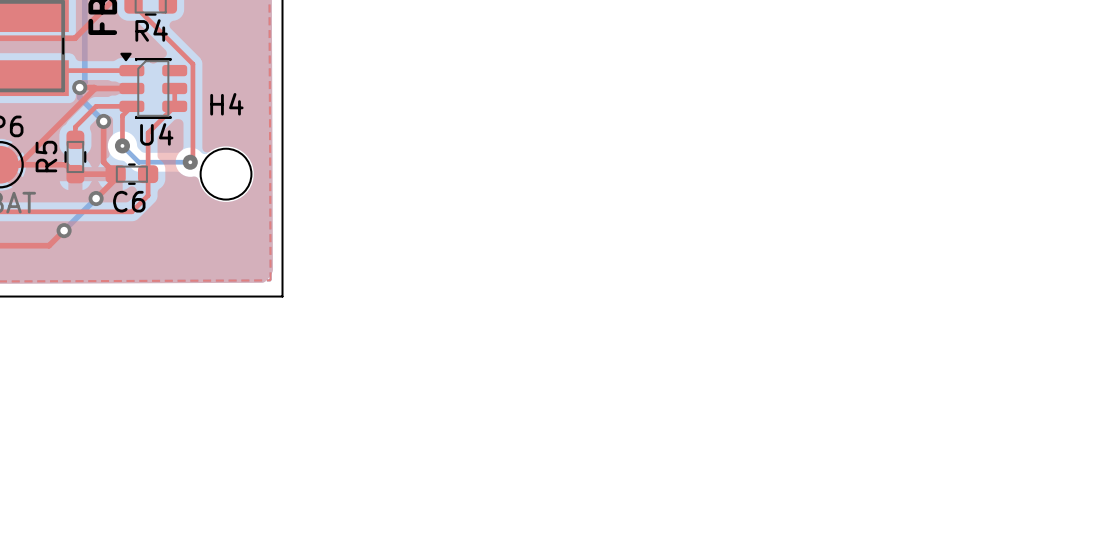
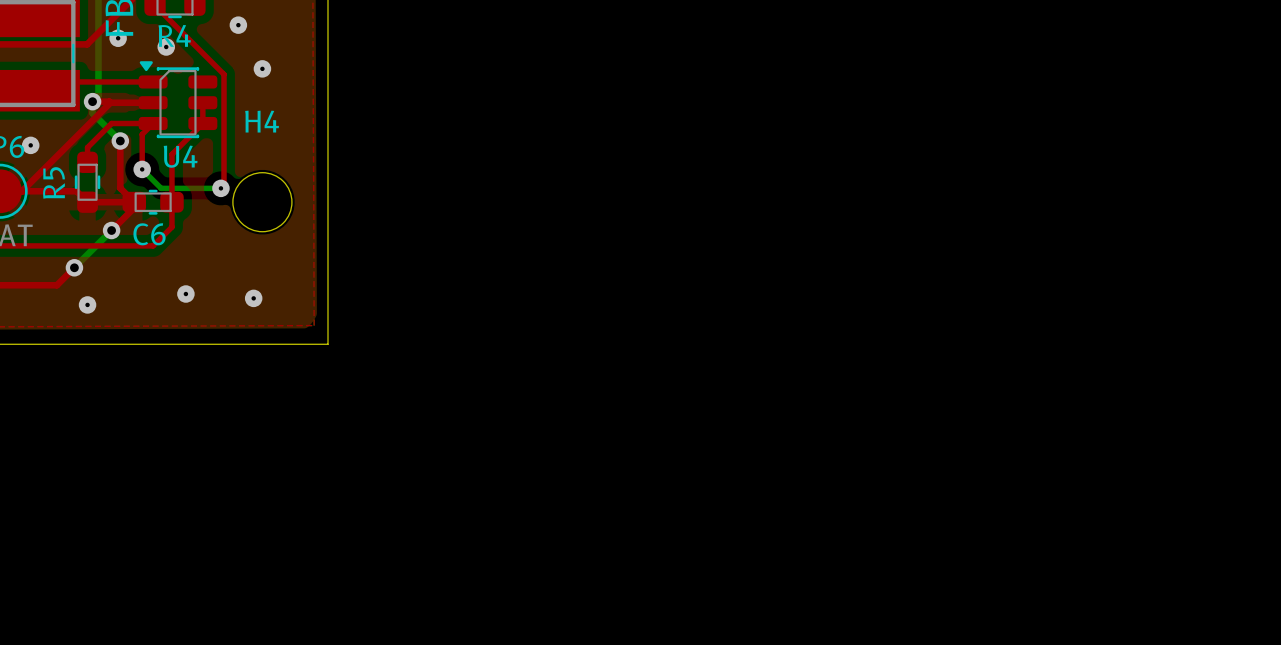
via: none -> (238, 25)
via: none -> (118, 38)
via: none -> (166, 47)
via: none -> (262, 68)
via: none -> (30, 145)
via: none -> (185, 294)
via: none -> (253, 298)
via: none -> (87, 304)

